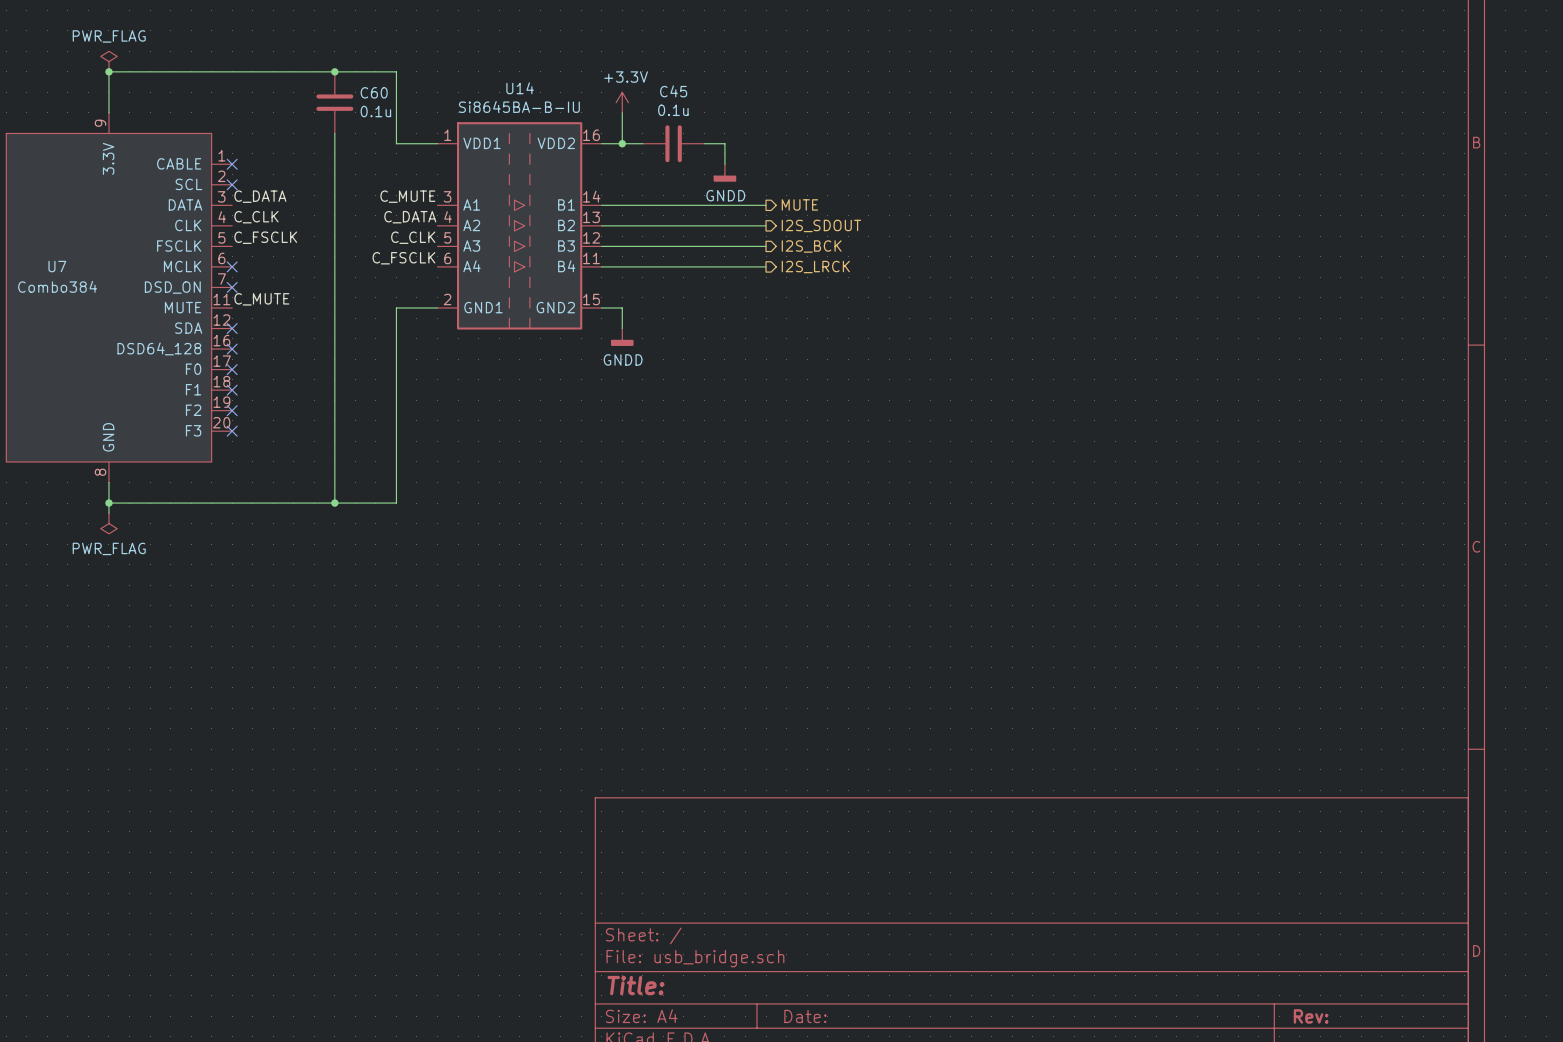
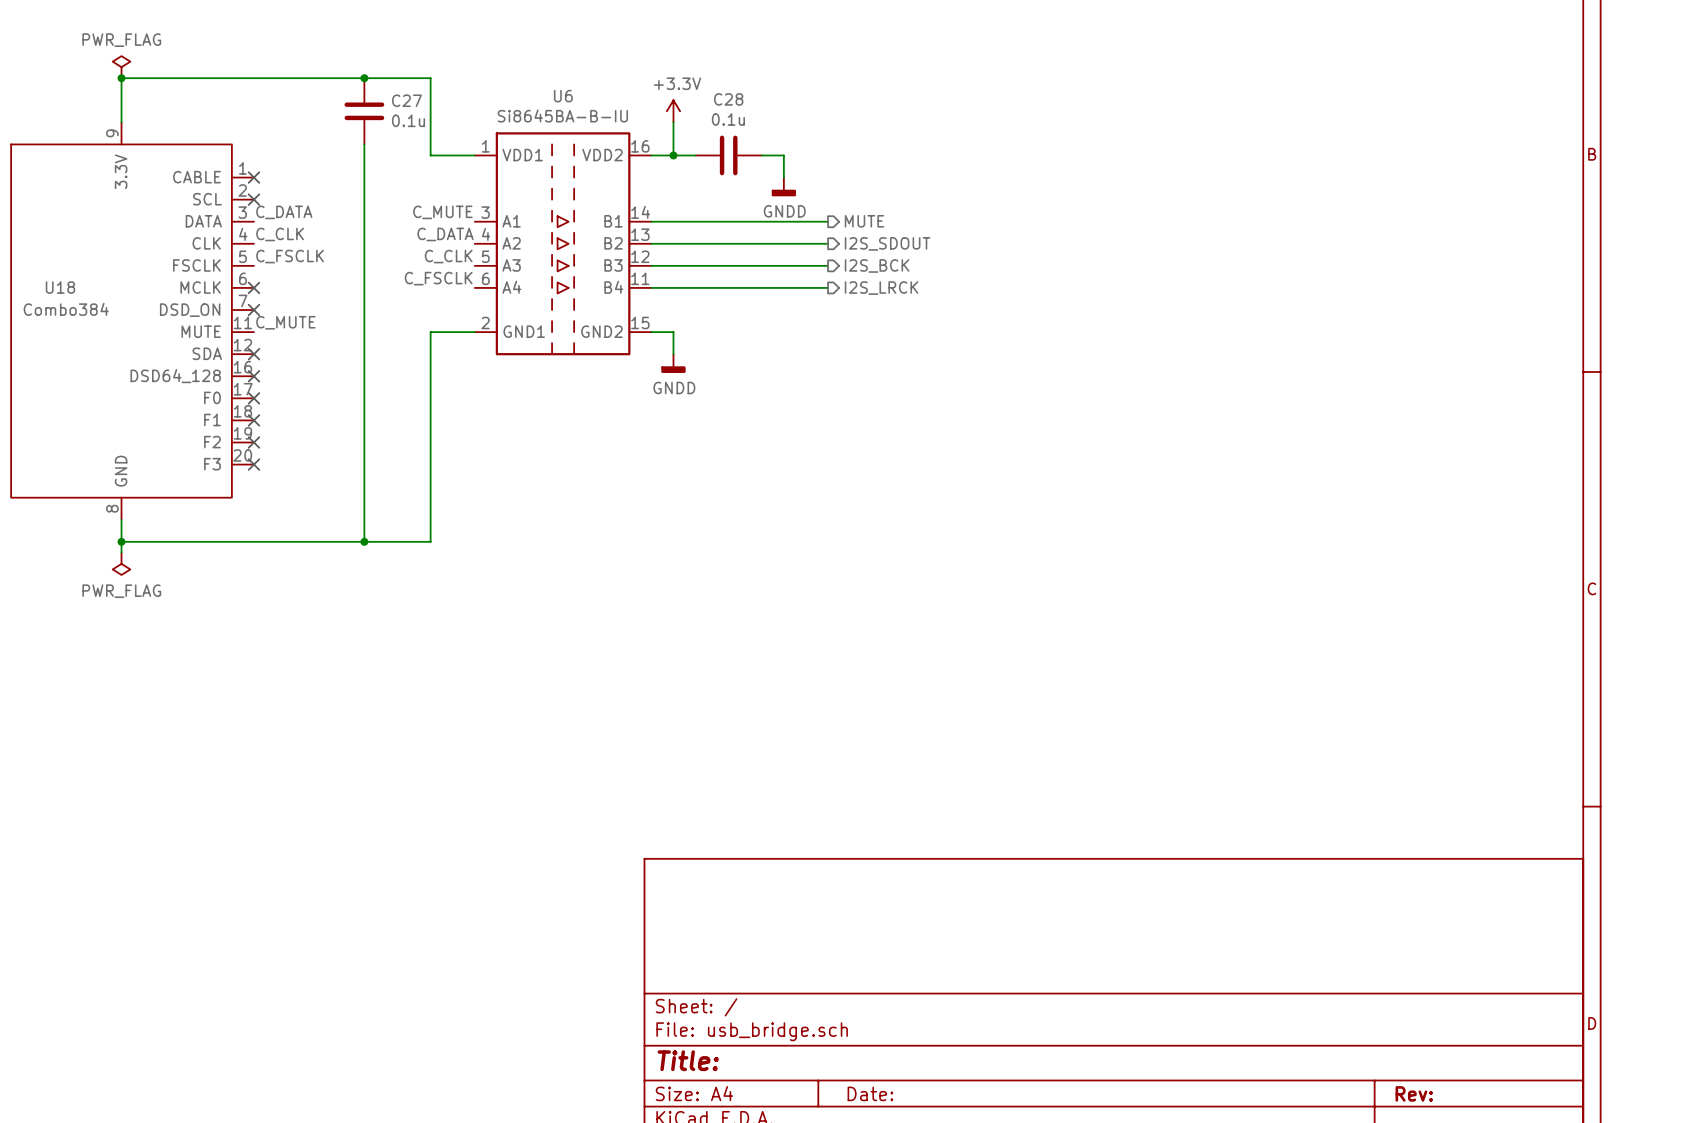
U14 name: U14 (520, 88) -> U6 (563, 96)
C45 name: C45 (673, 91) -> C28 (728, 99)
C60 name: C60 (374, 92) -> C27 (406, 100)
U7 name: U7 (57, 266) -> U18 (60, 287)

